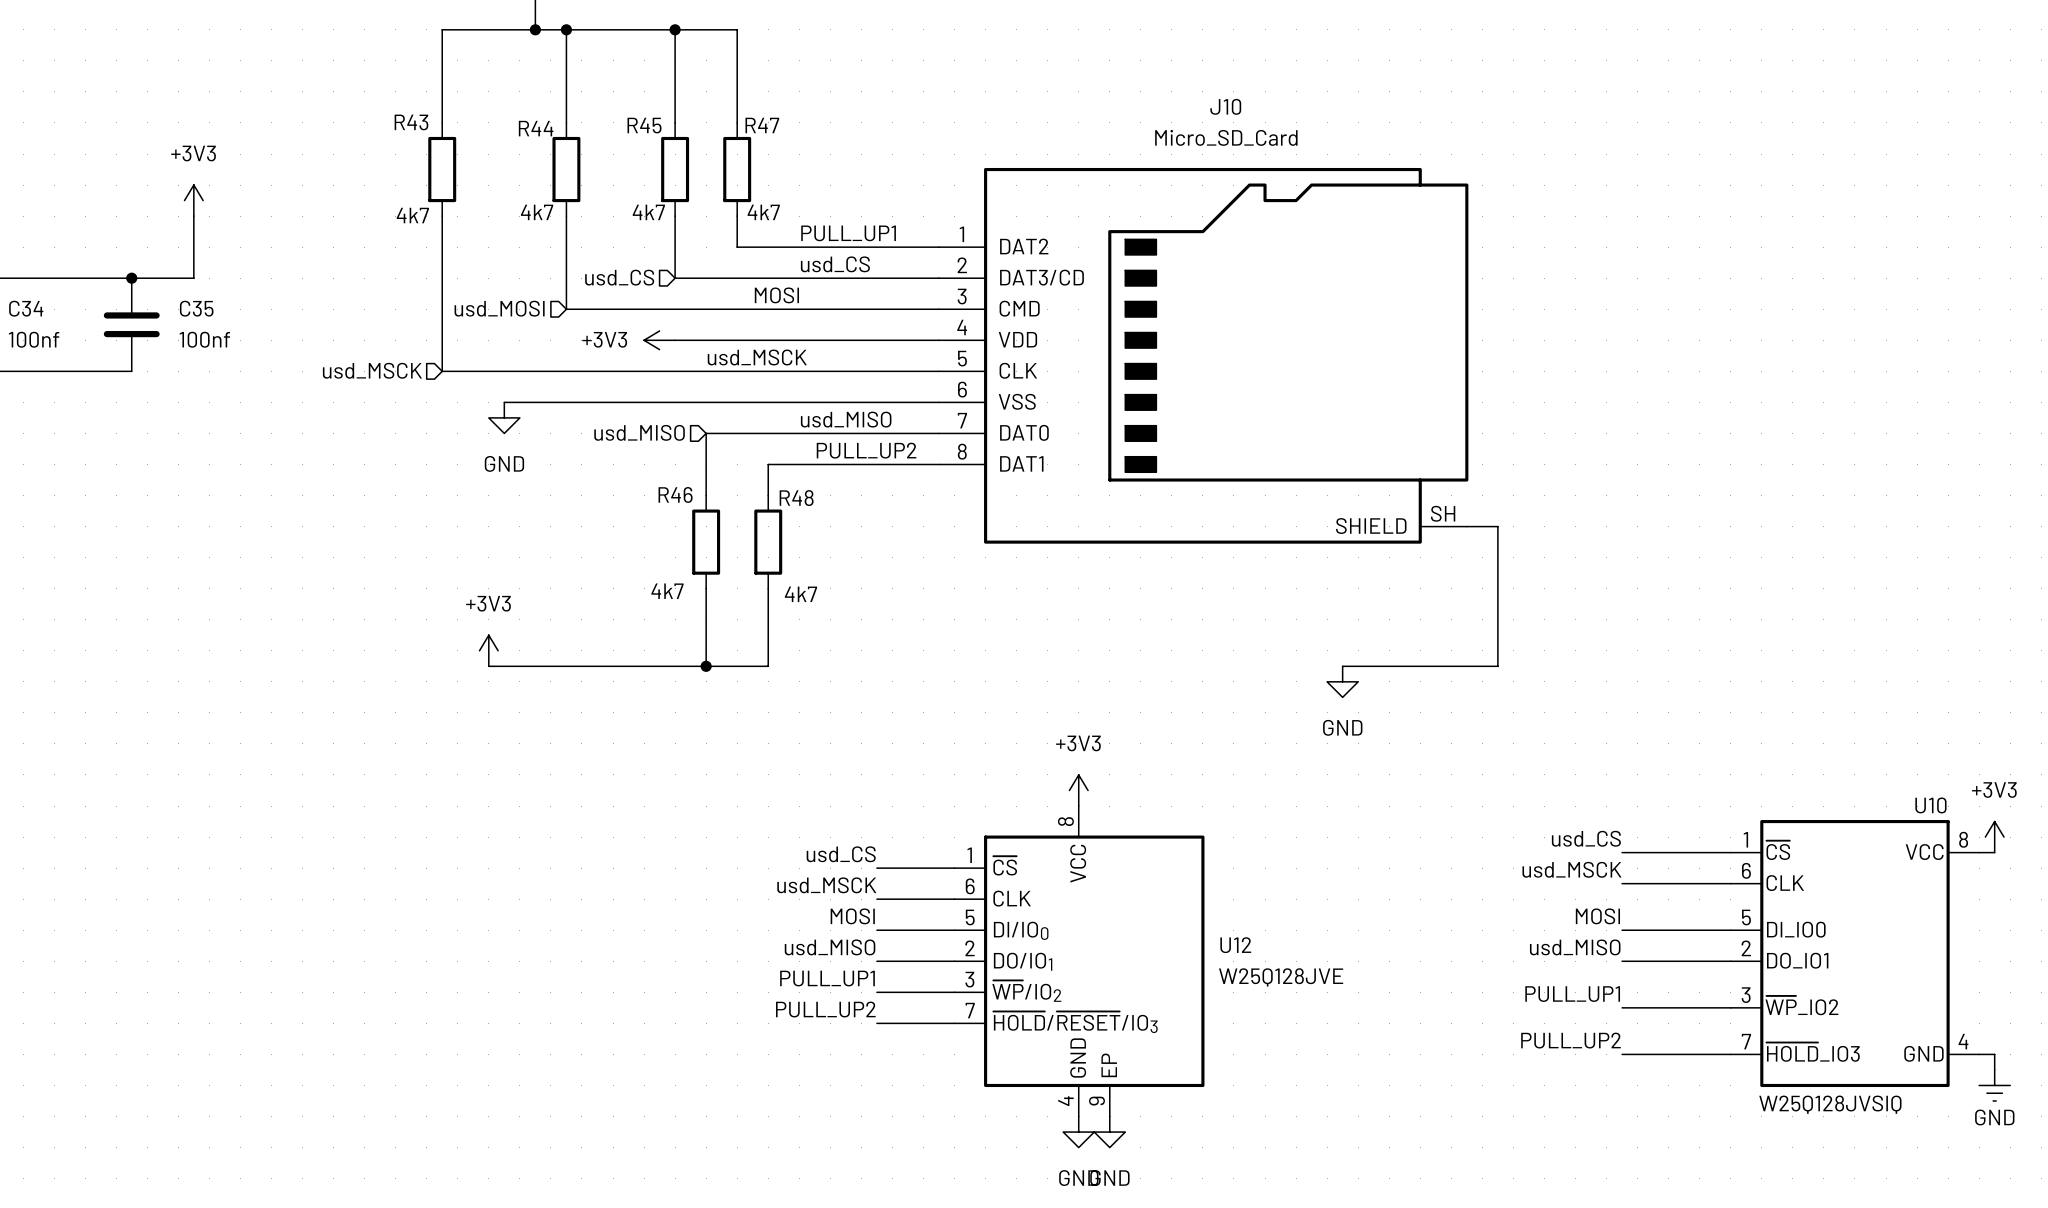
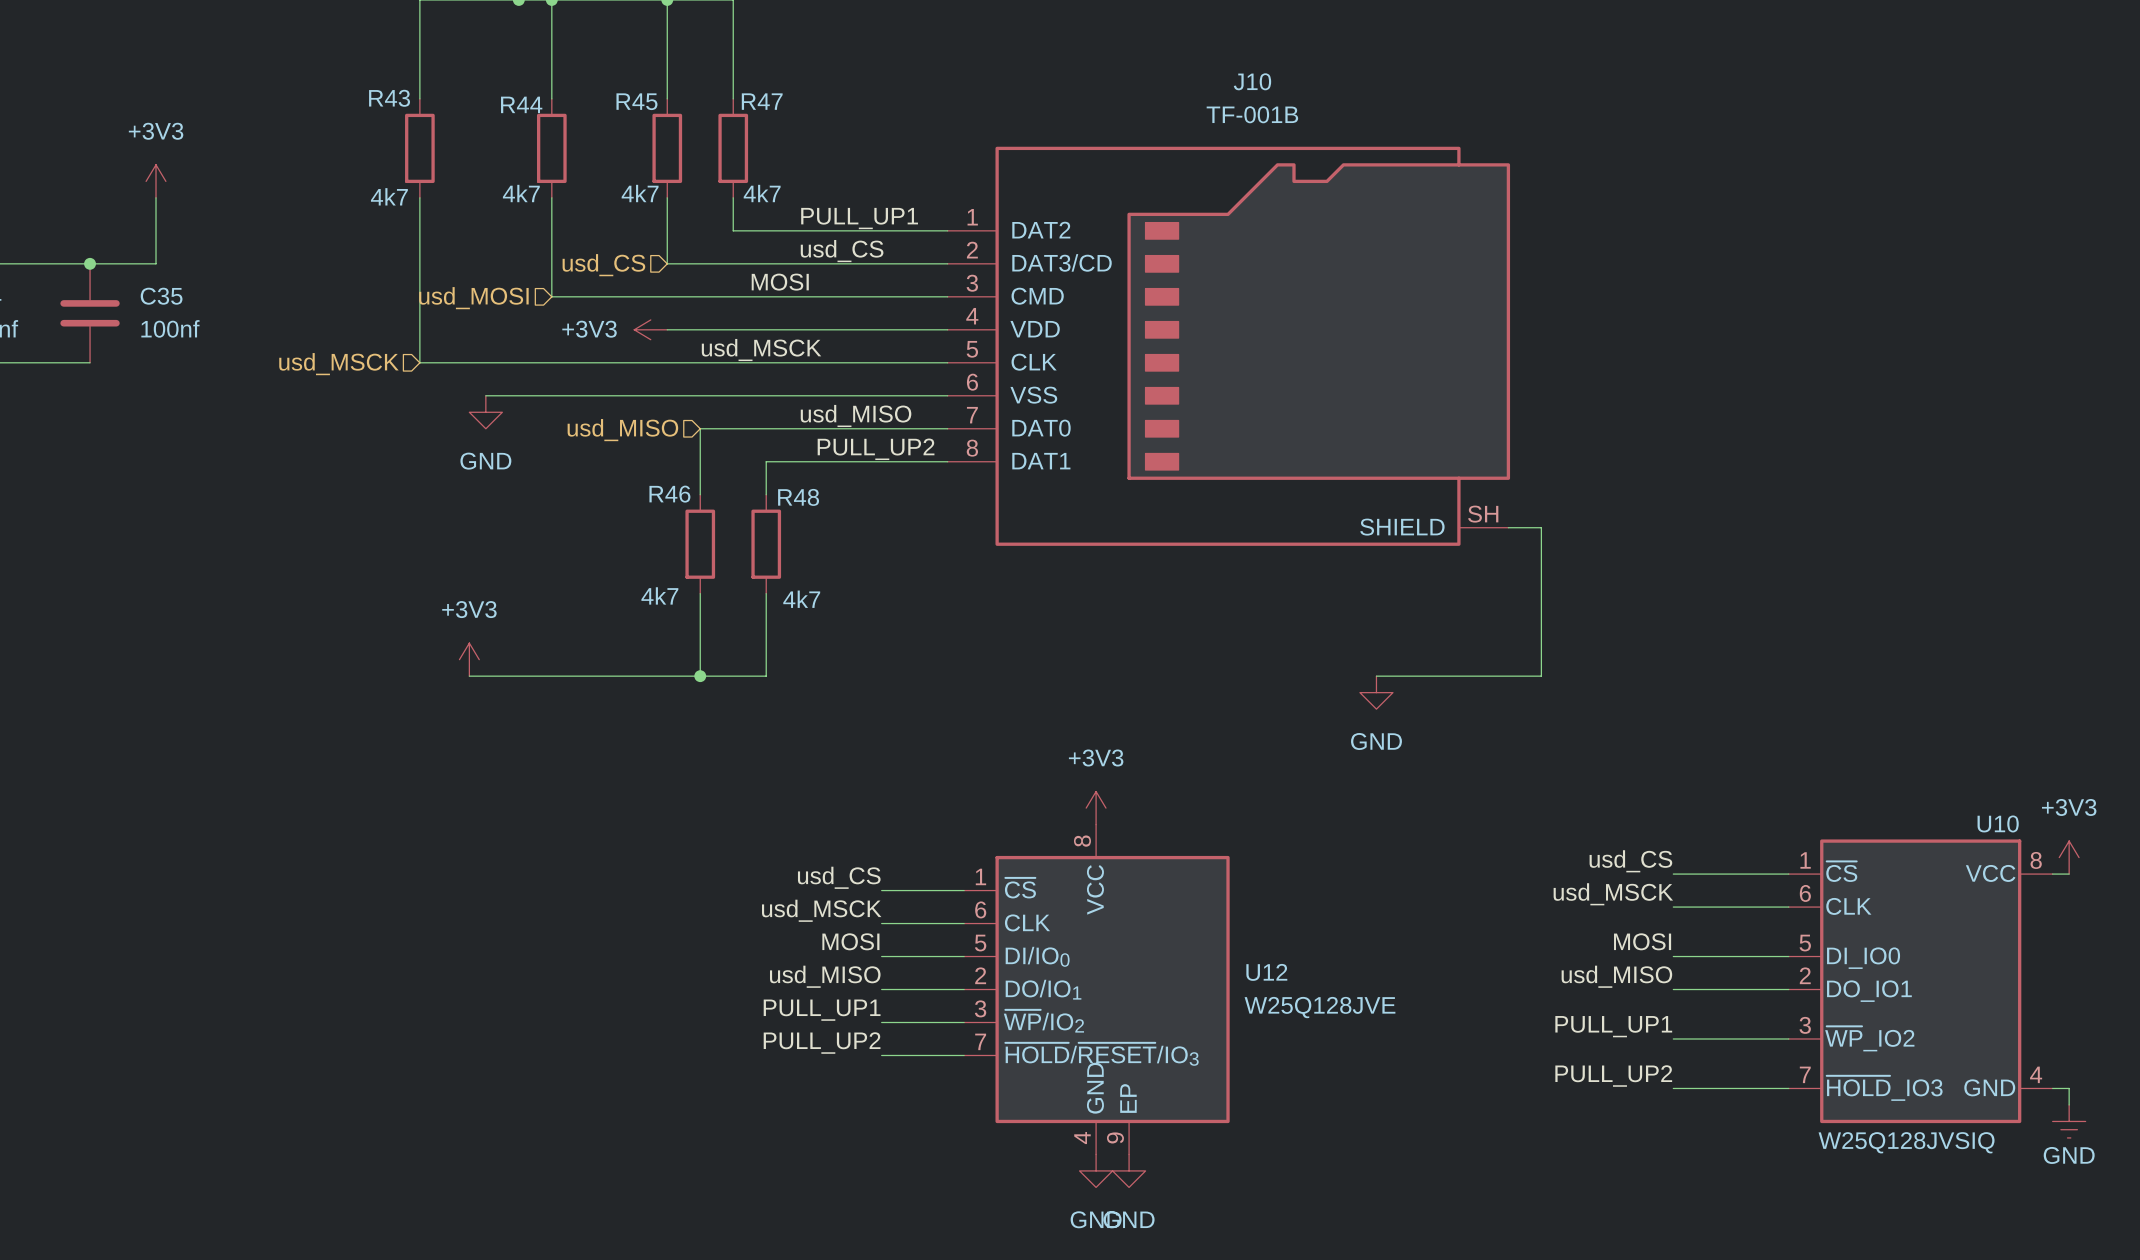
J10 value: Micro_SD_Card (1226, 137) -> TF-001B (1252, 114)

